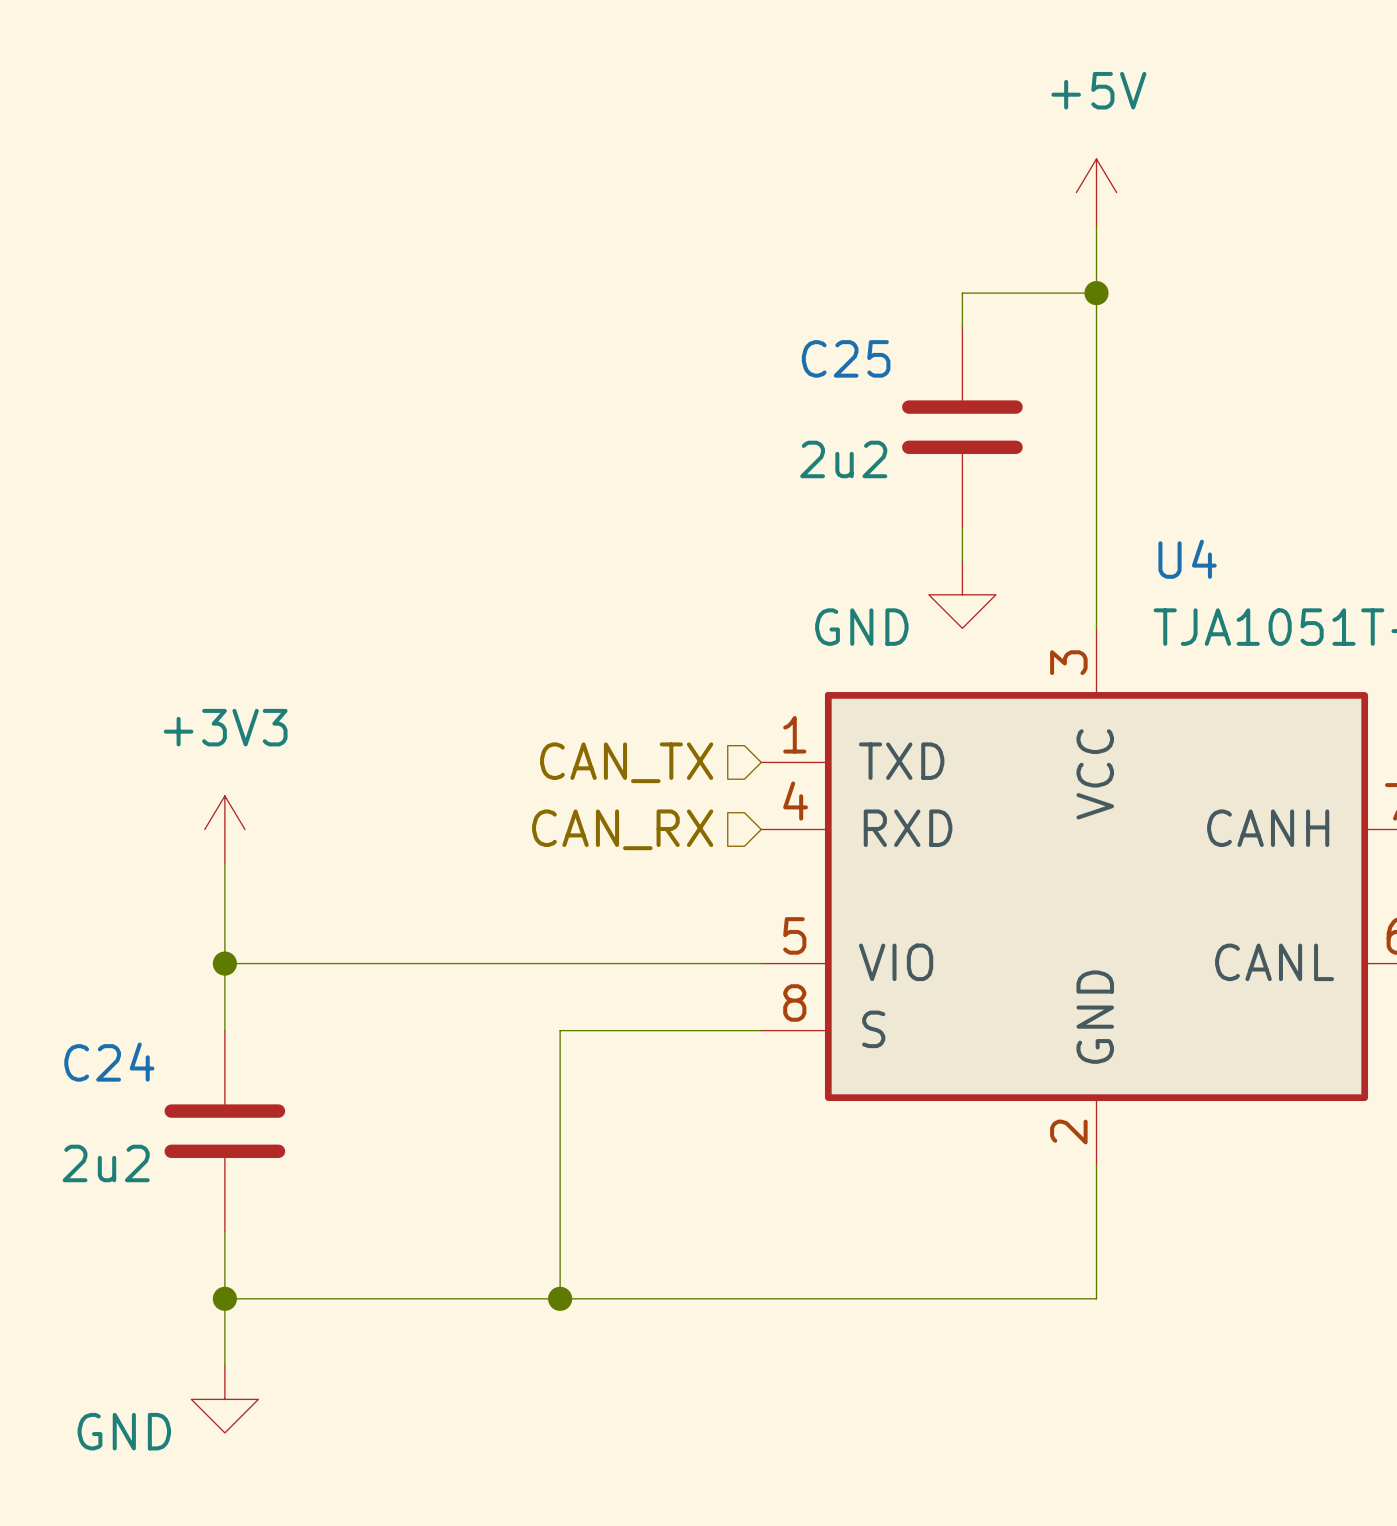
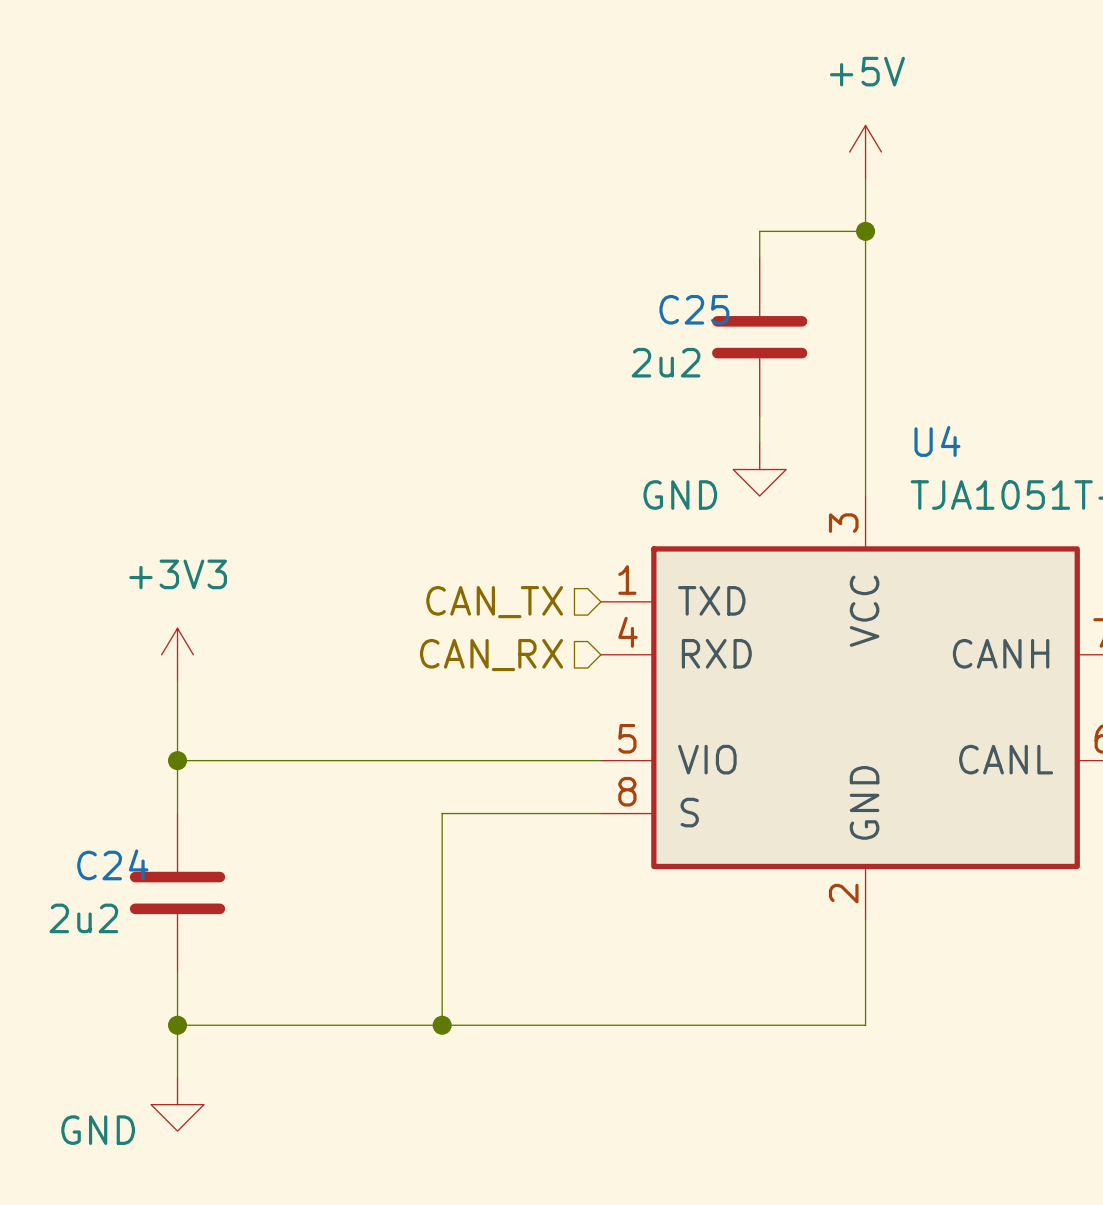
C25 name position: C25 (846, 358) -> C25 (694, 309)
C24 name position: C24 (109, 1062) -> C24 (112, 864)

